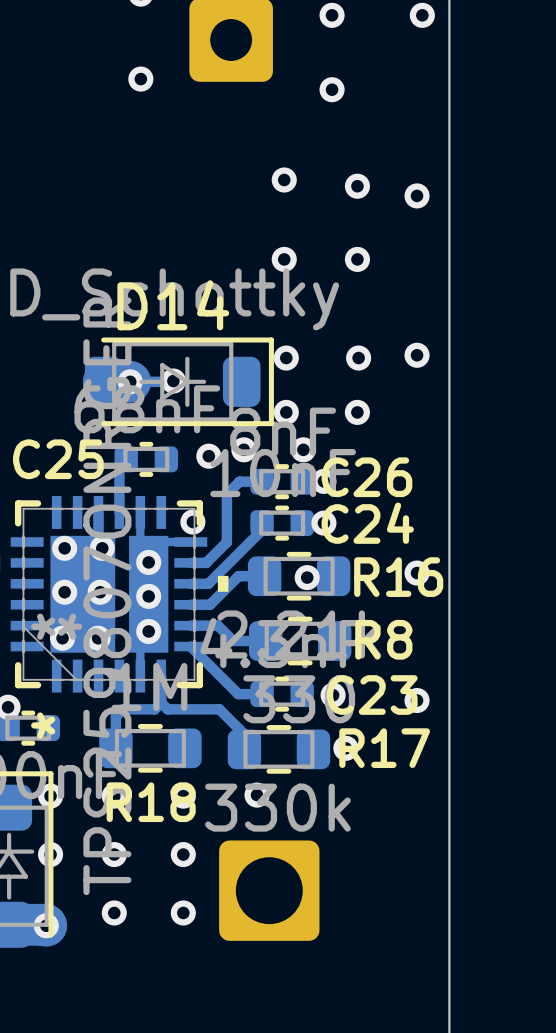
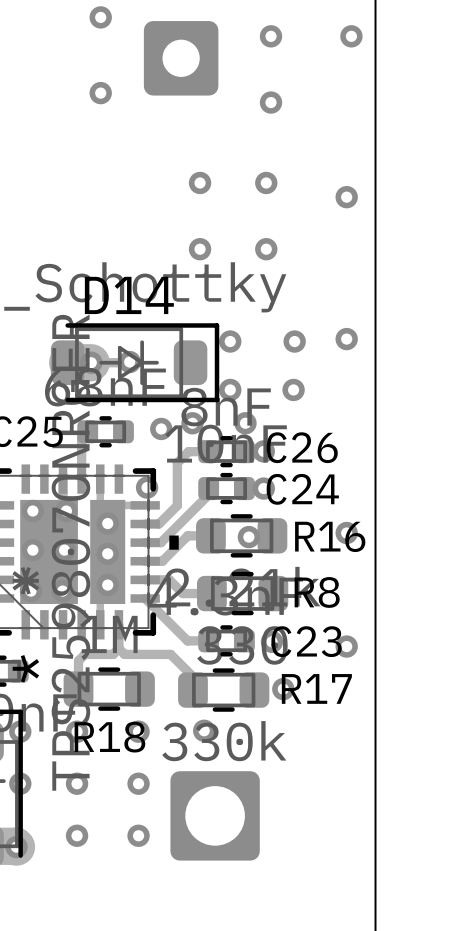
via: none -> (200, 182)
via: (284, 179) -> none
via: none -> (266, 182)
via: (357, 186) -> none
via: none -> (200, 249)
via: none -> (266, 249)
via: (284, 259) -> none
via: (357, 259) -> none

